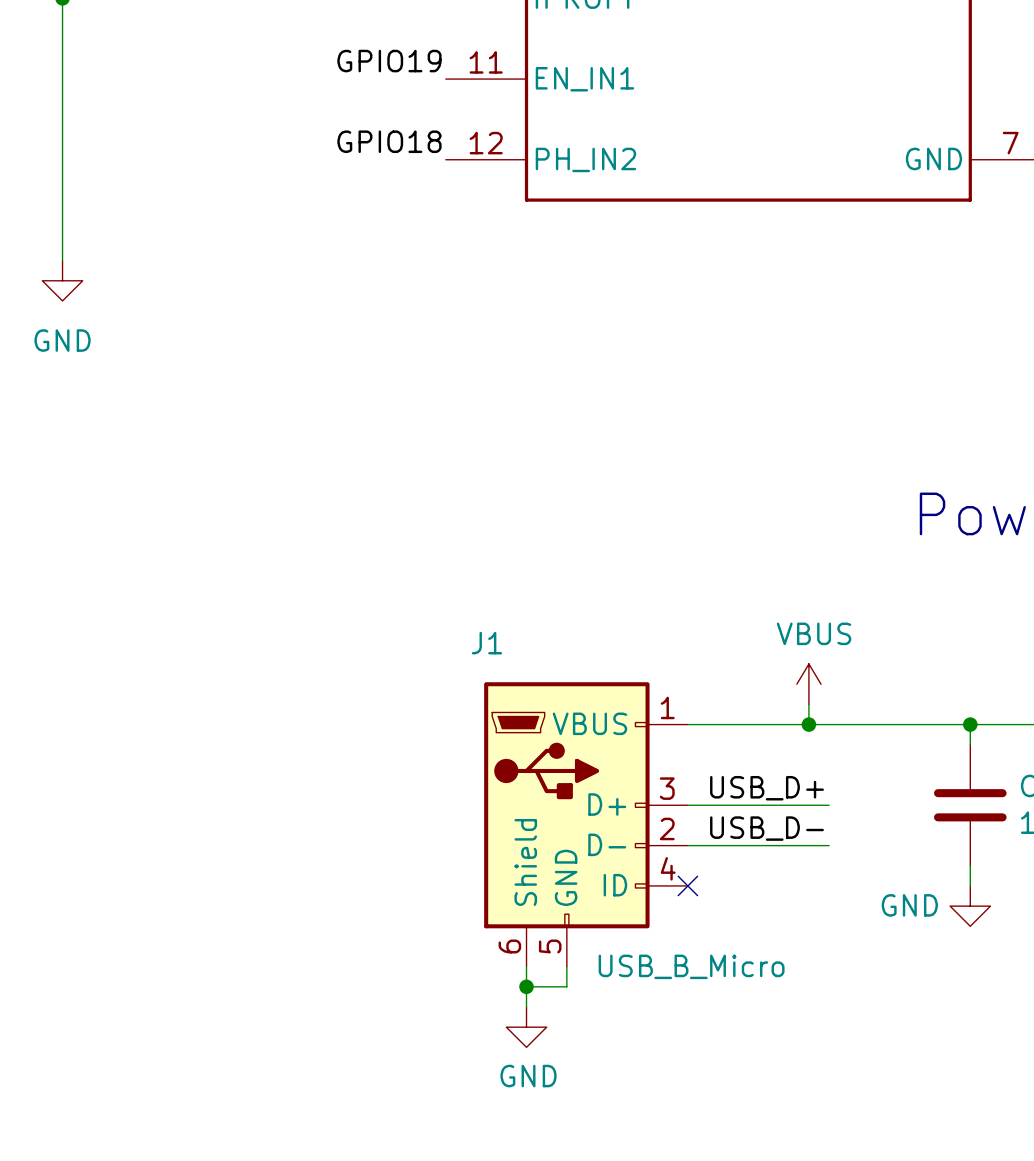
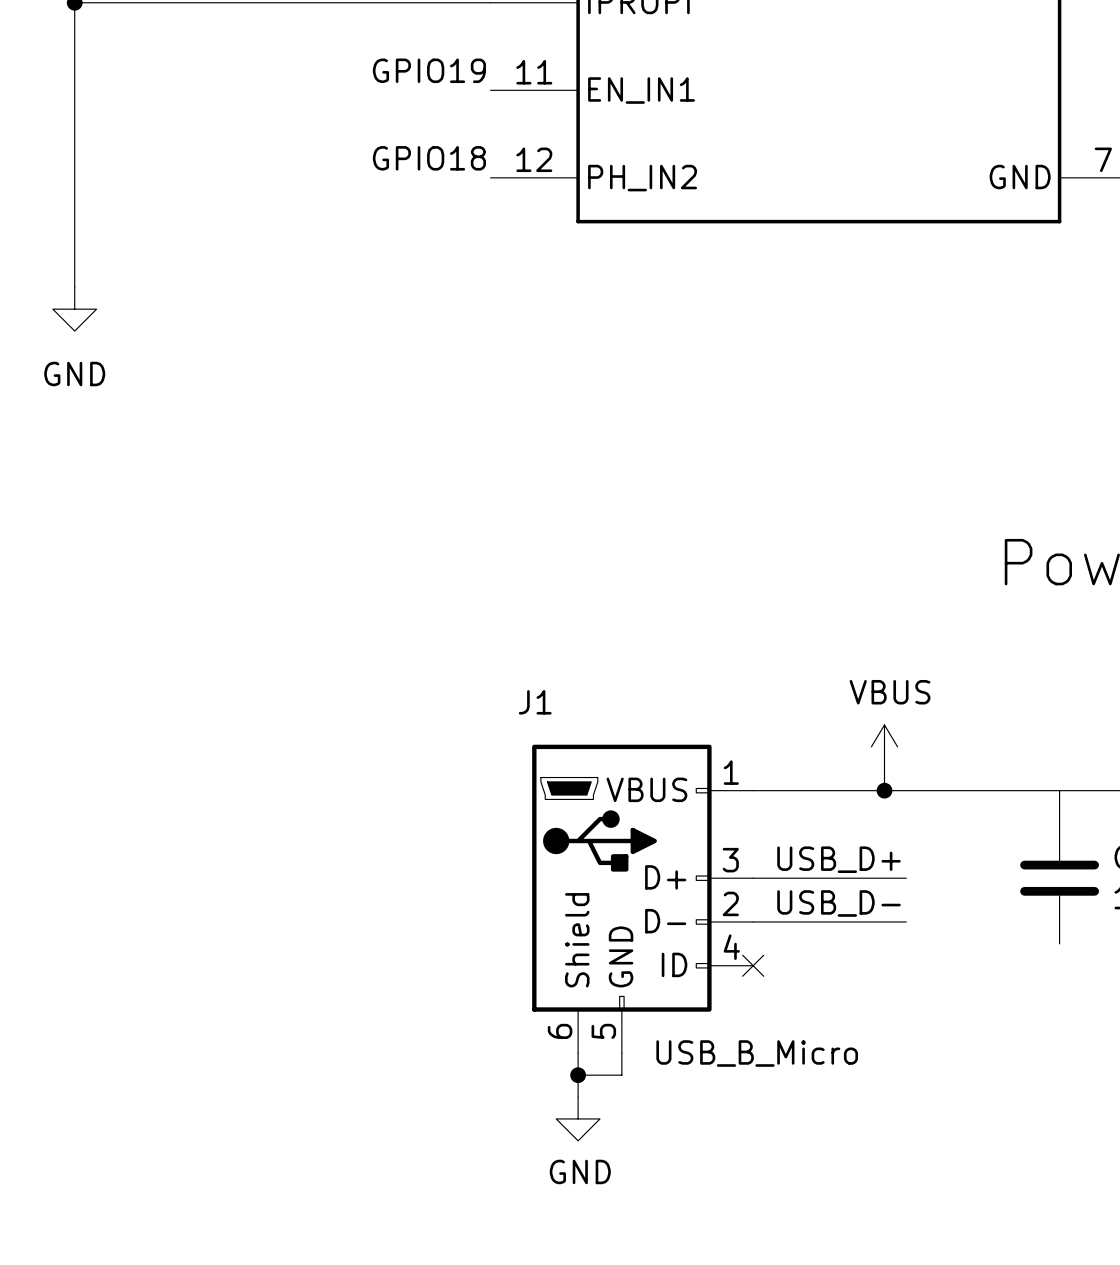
junction: (970, 724) -> none
wire: (970, 865) (970, 885) -> none
power symbol: GND (970, 906) -> none

